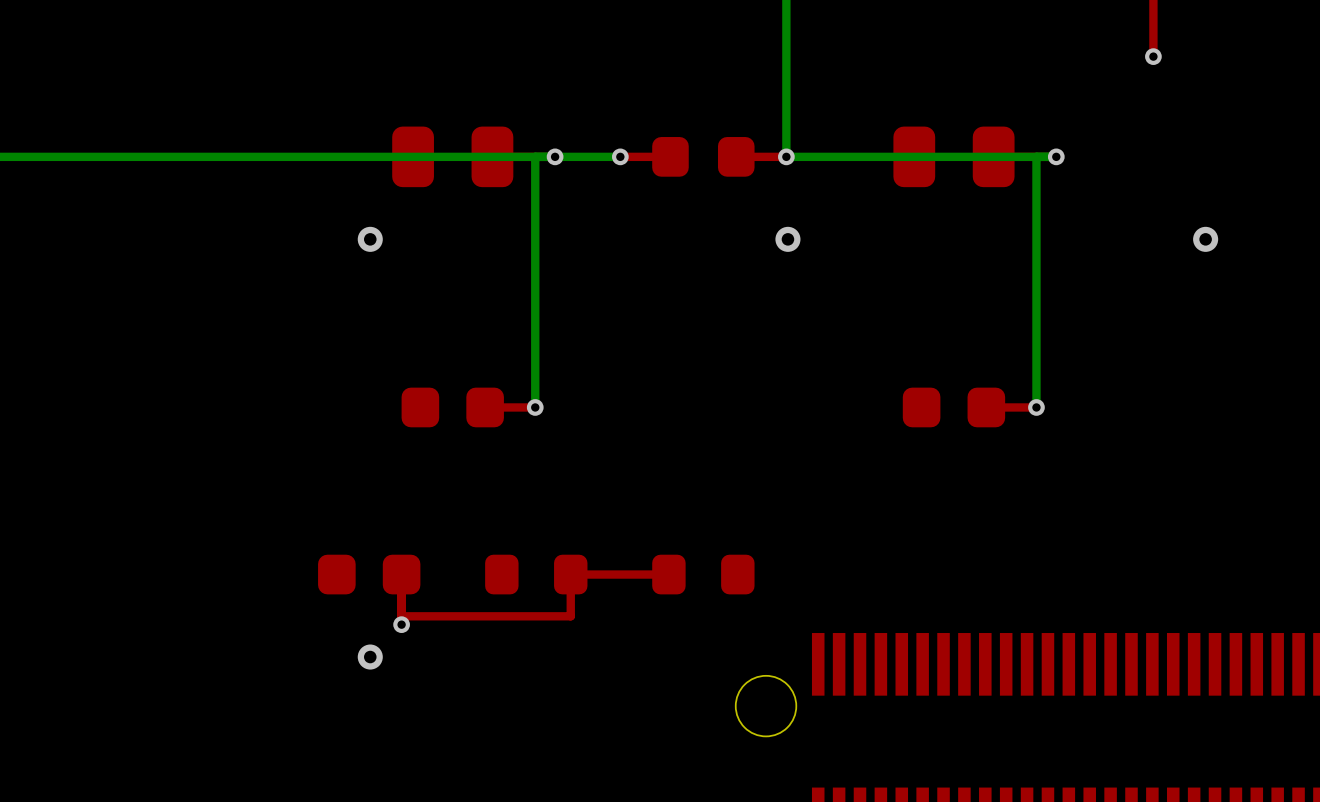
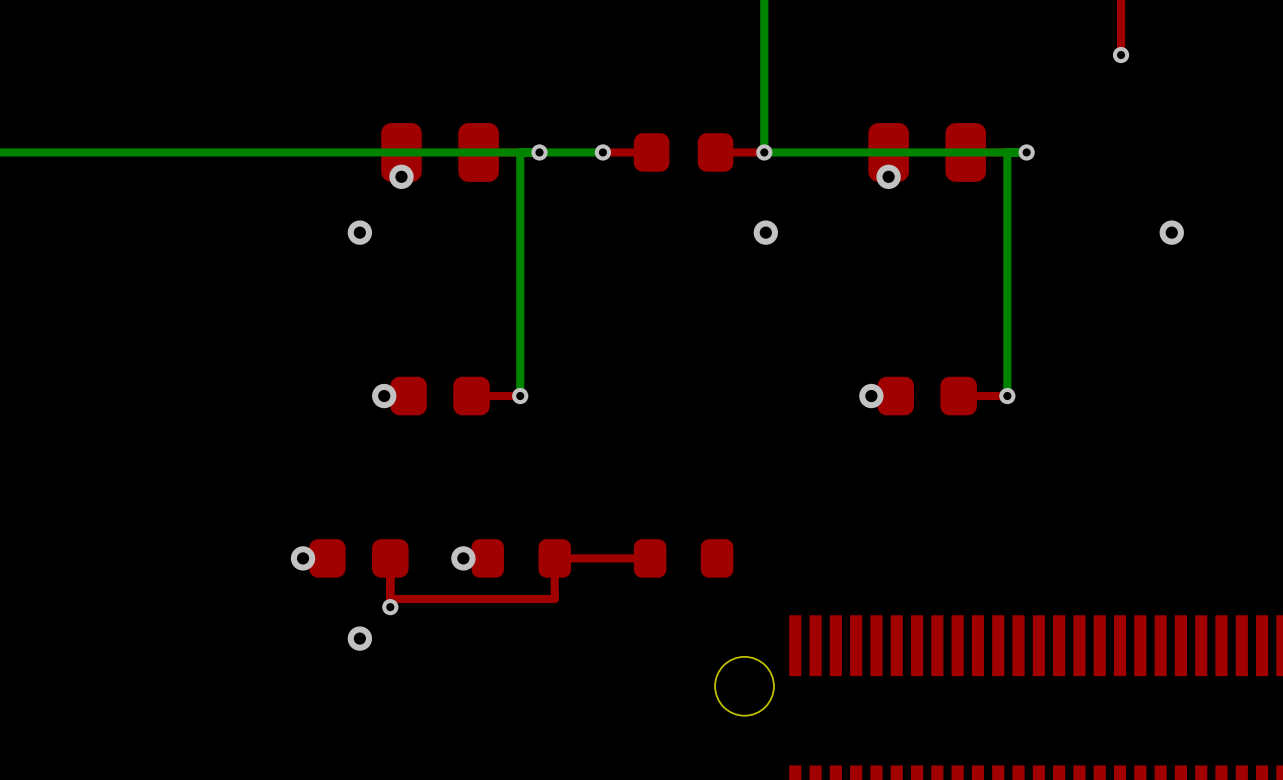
via: none -> (401, 176)
via: none -> (888, 176)
via: none -> (384, 396)
via: none -> (871, 396)
via: none -> (303, 558)
via: none -> (463, 558)

